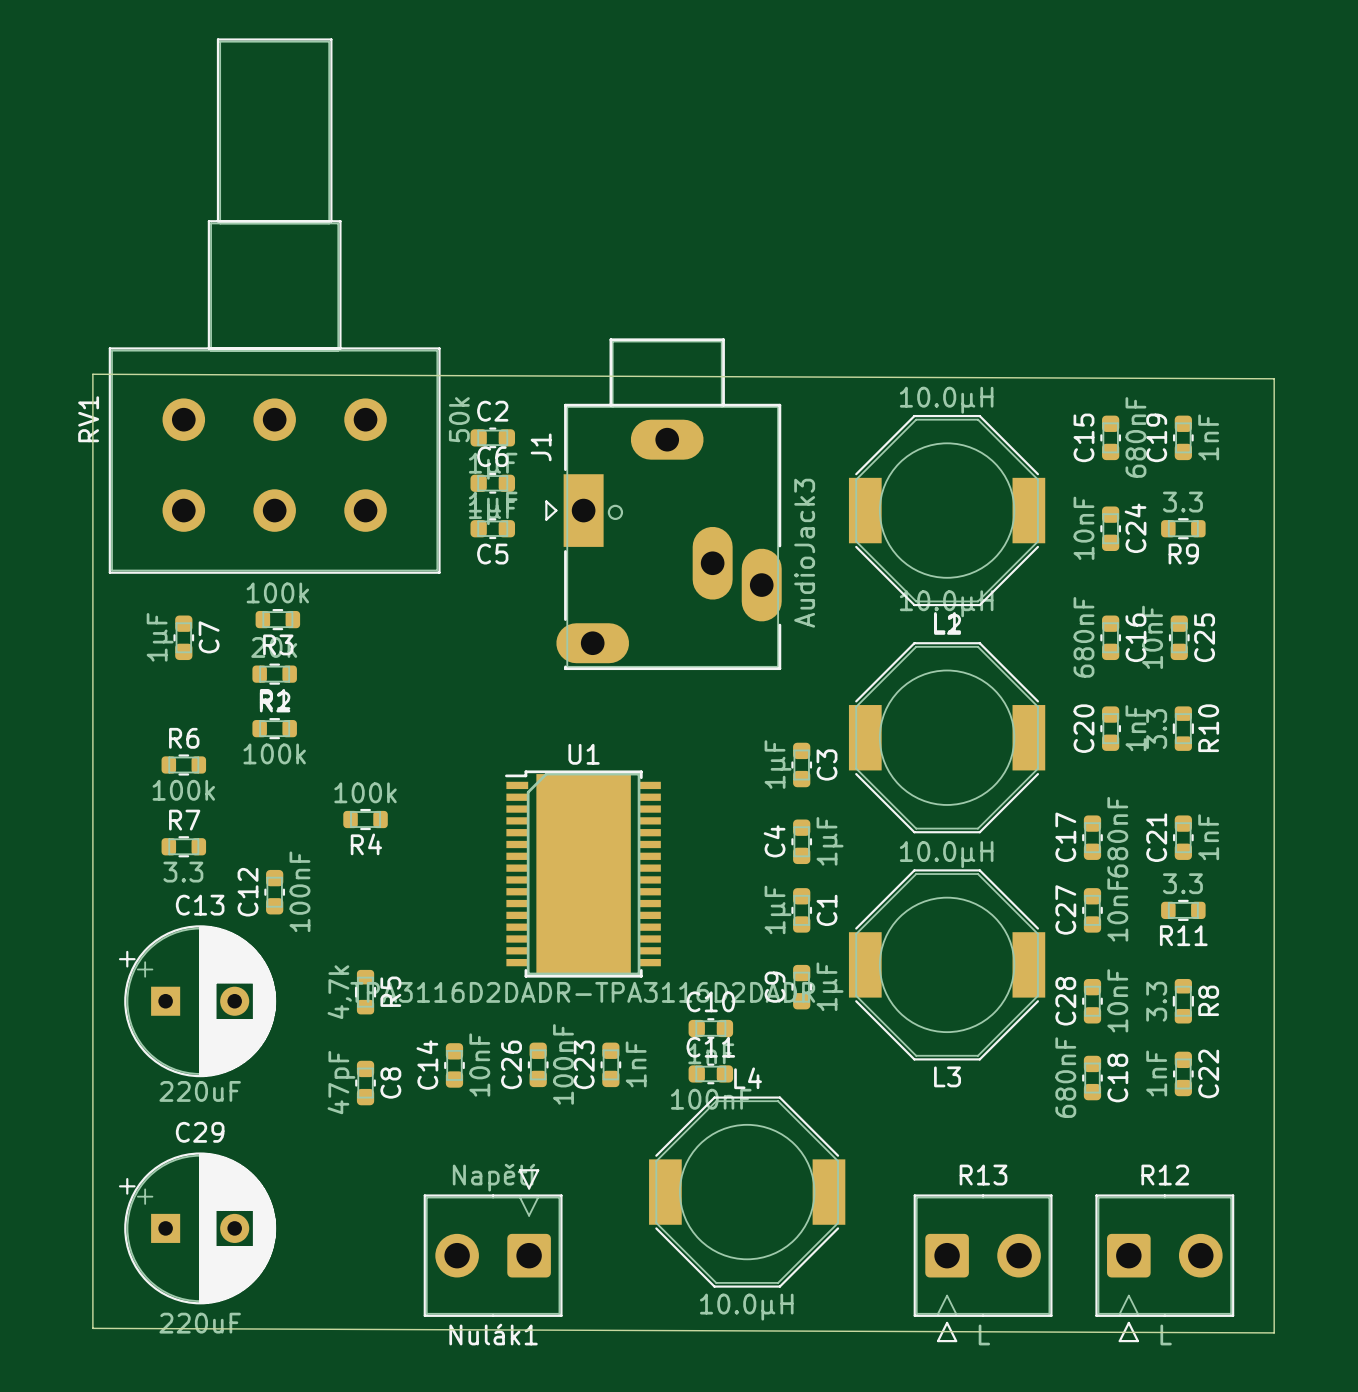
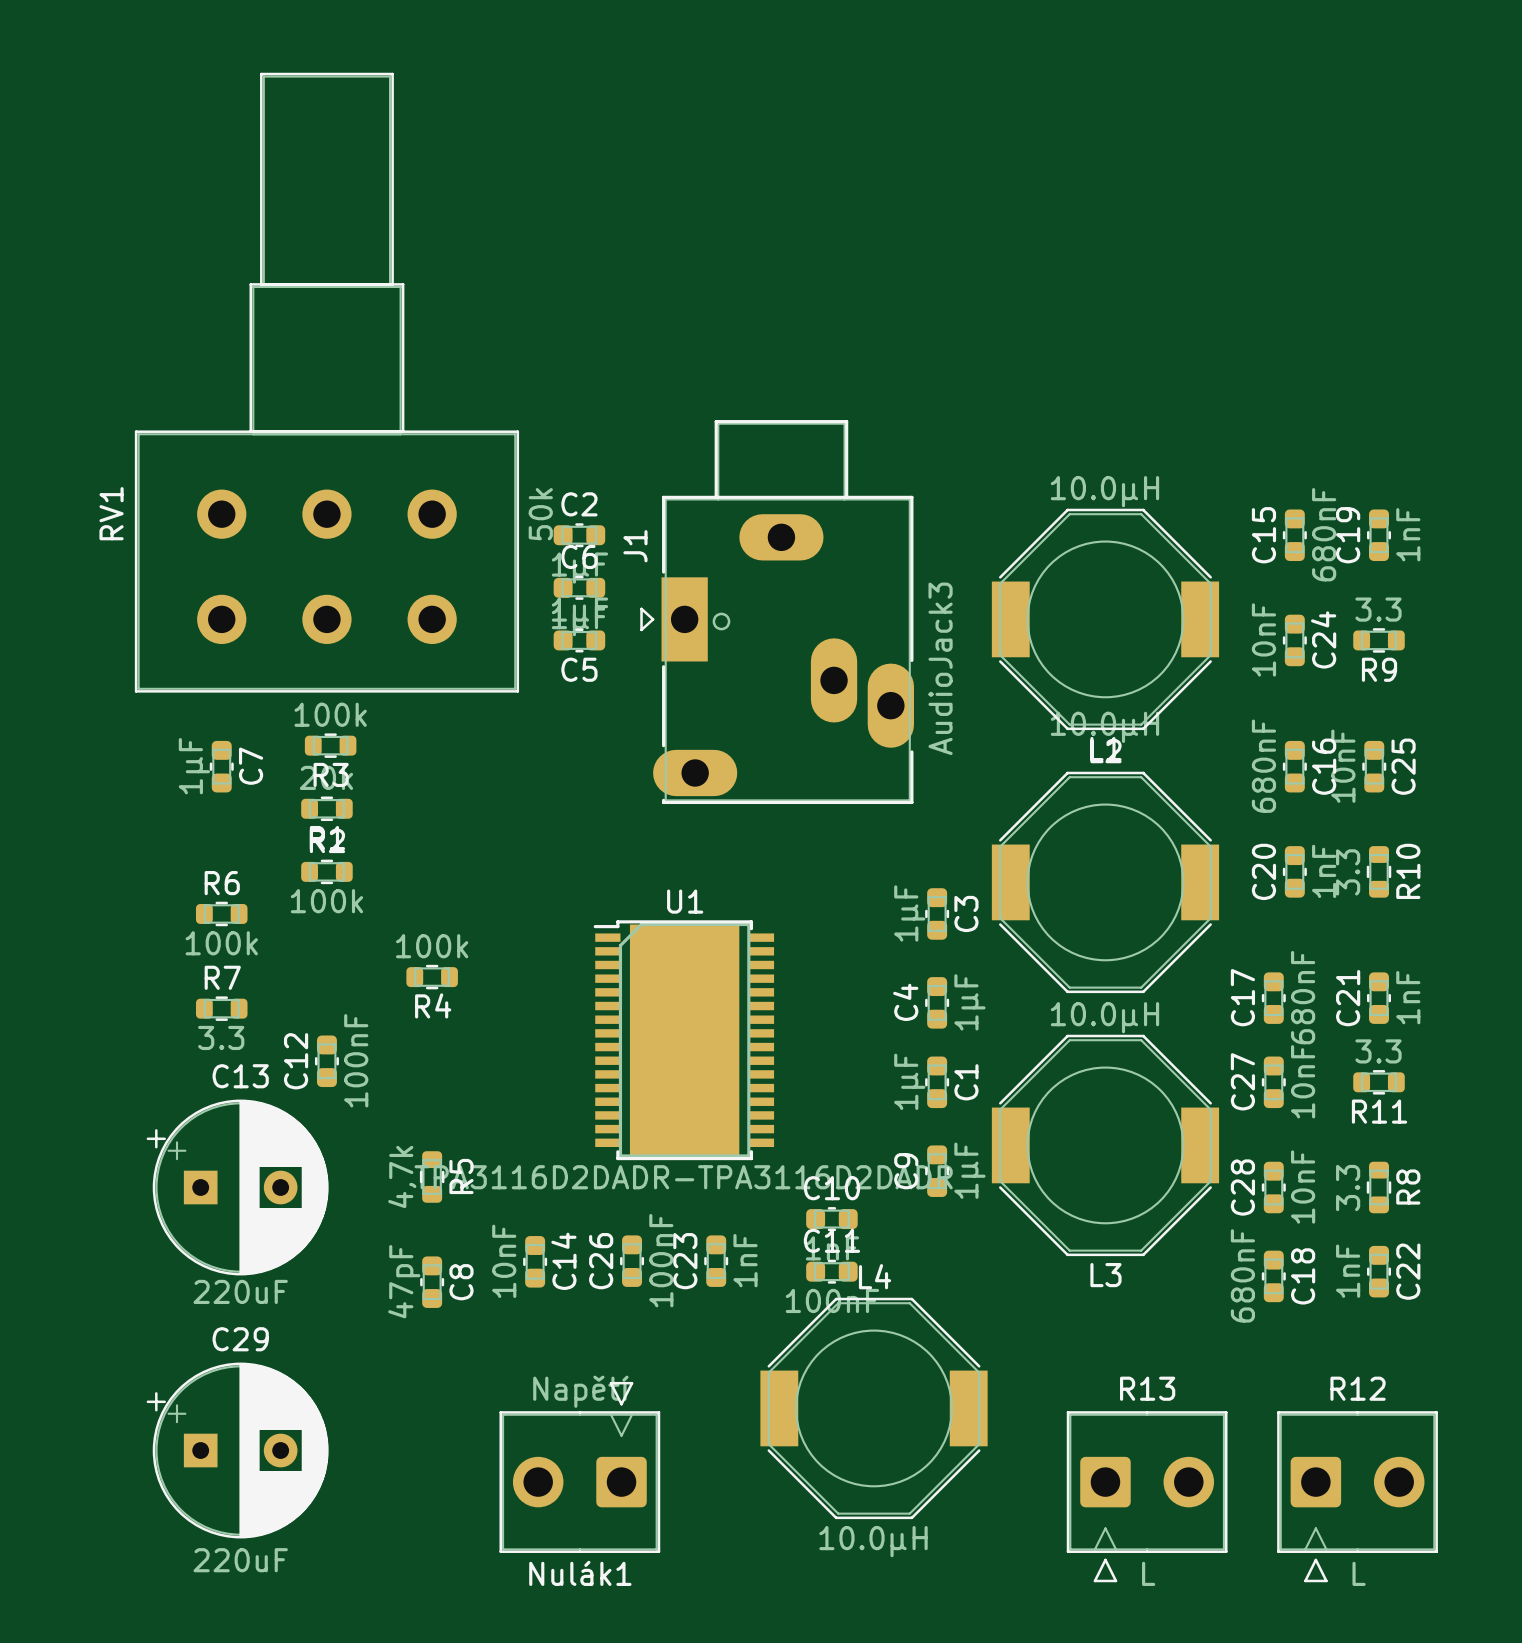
board edge: (92, 374) (92, 1328) (1274, 1332) (1274, 378) (92, 374) -> none
C14 name position: C14 (427, 1065) -> C14 (563, 1261)
C14 value position: 10nF (479, 1065) -> 10nF (504, 1261)

